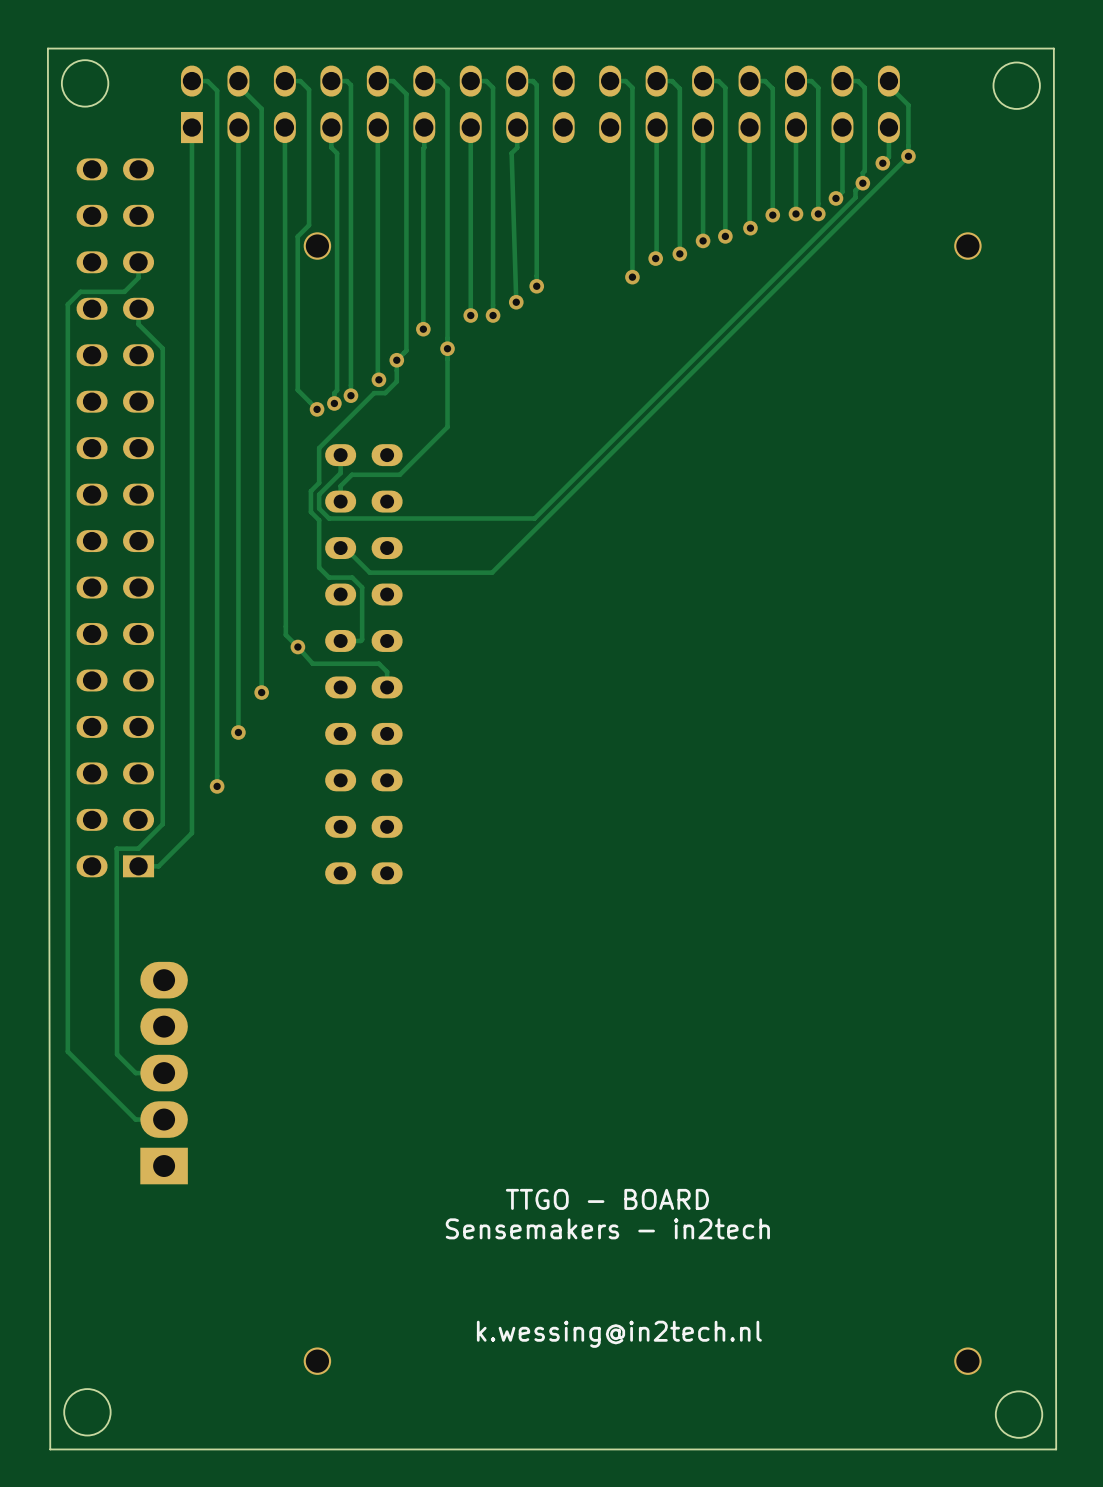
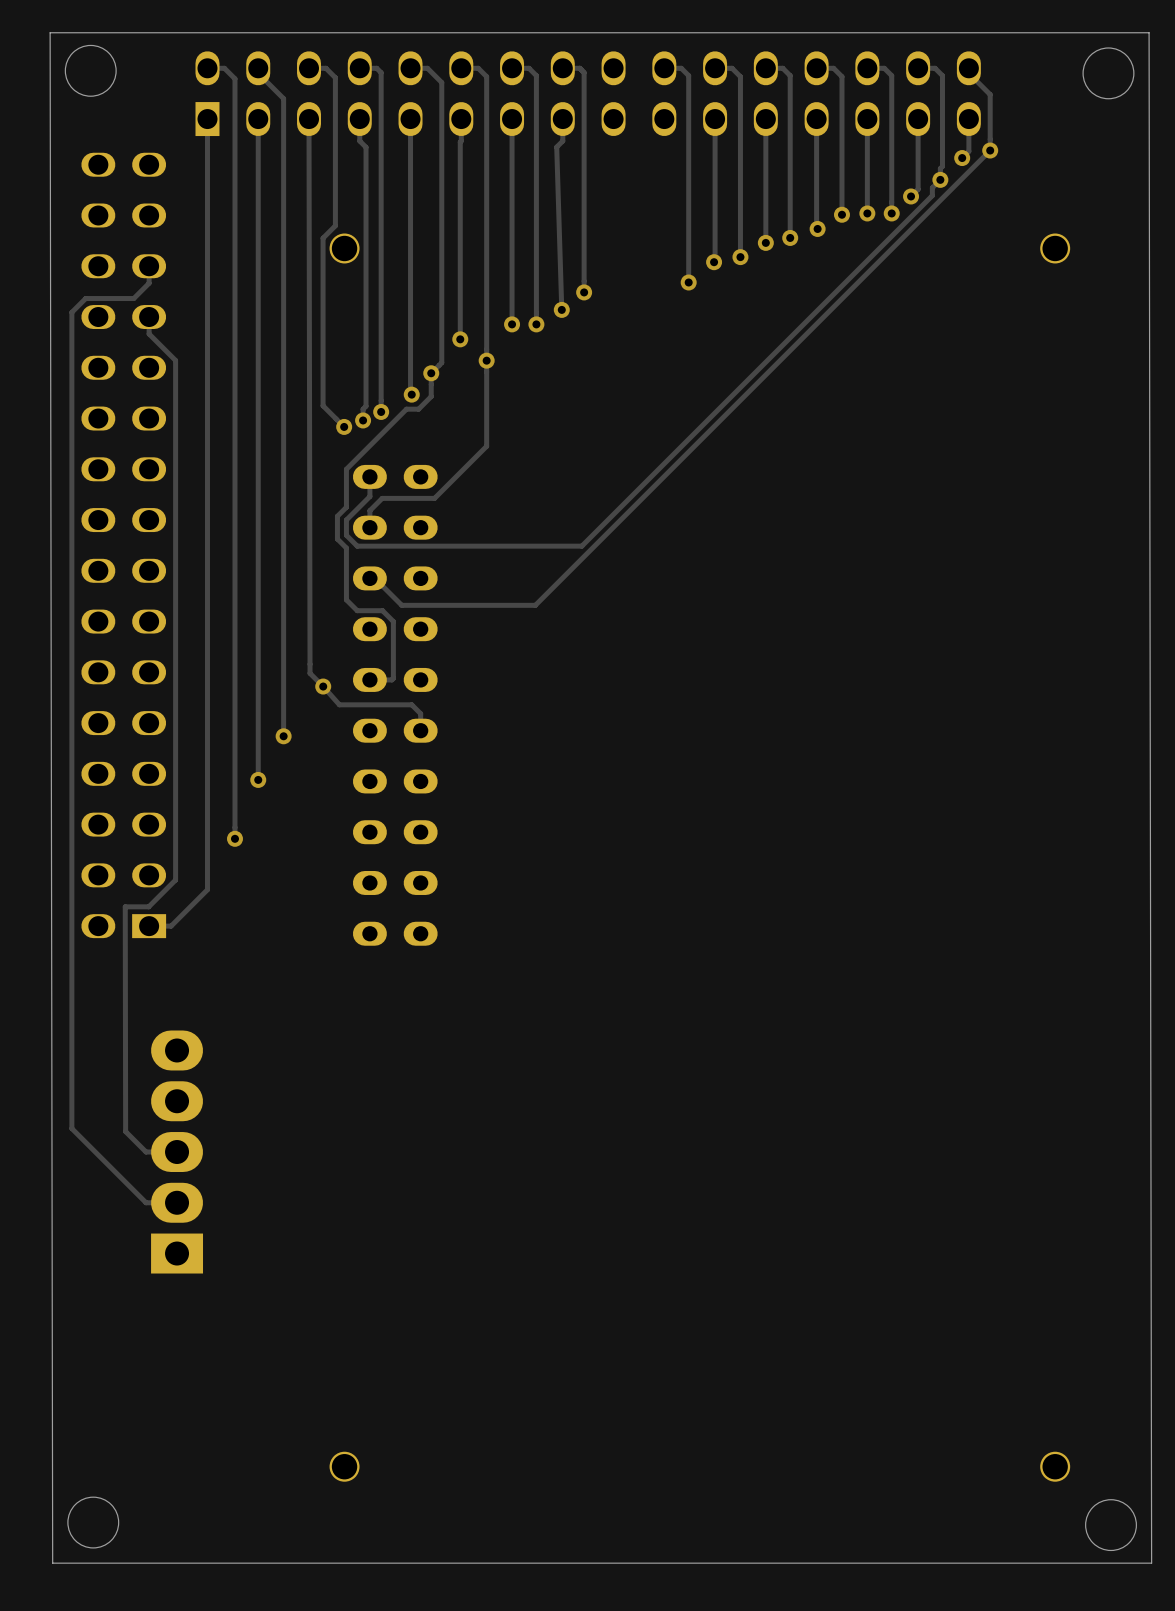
text: TTGO - BOARD (607, 1199) -> none
text: Sensemakers - in2tech (607, 1228) -> none
text: k.wessing@in2tech.nl (619, 1334) -> none

